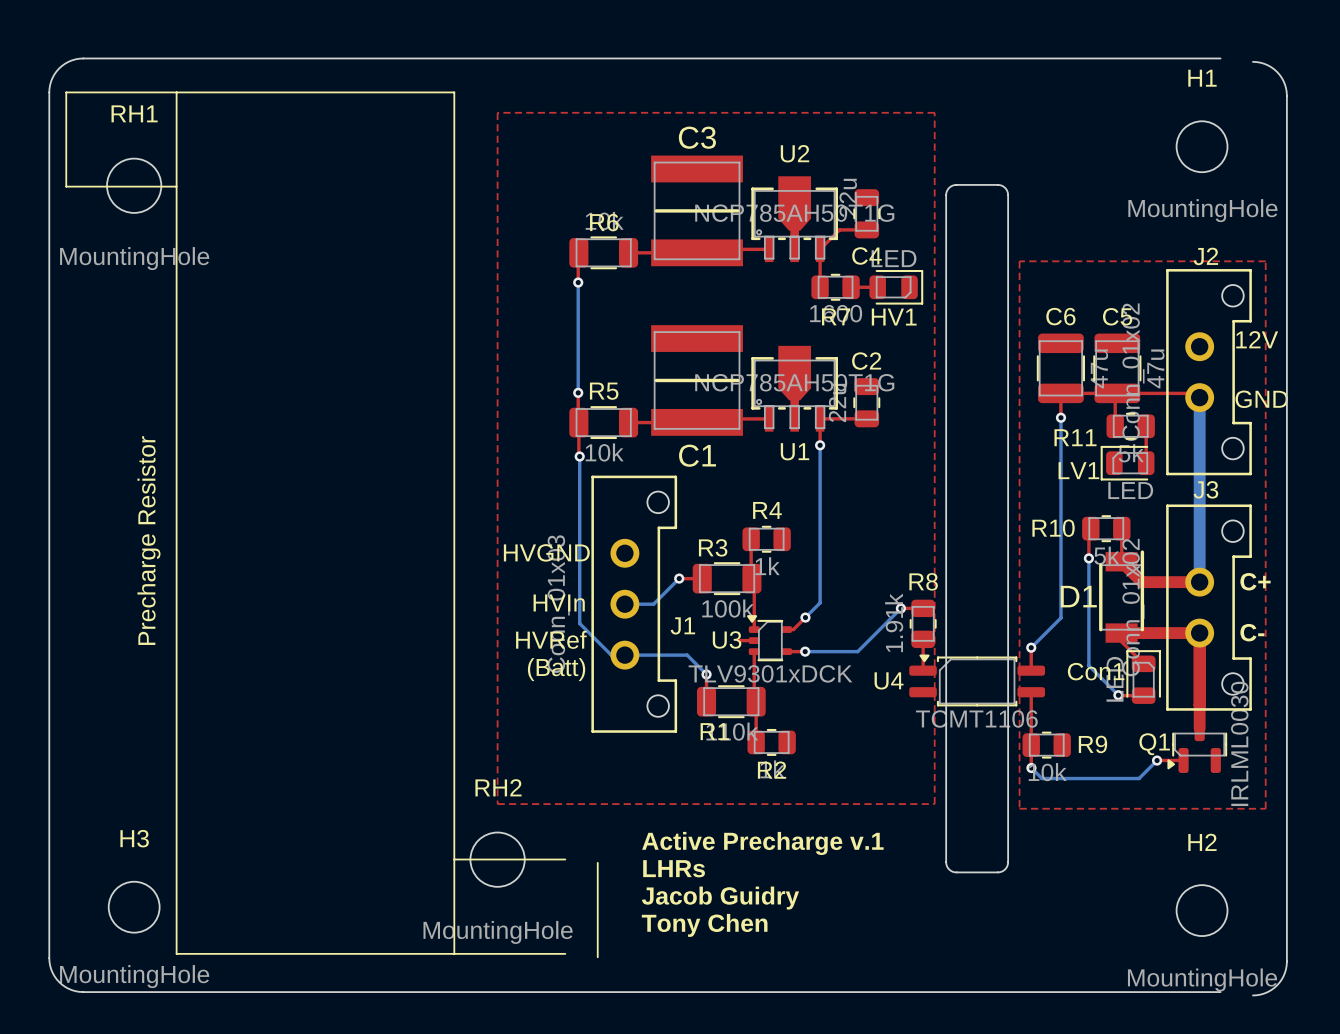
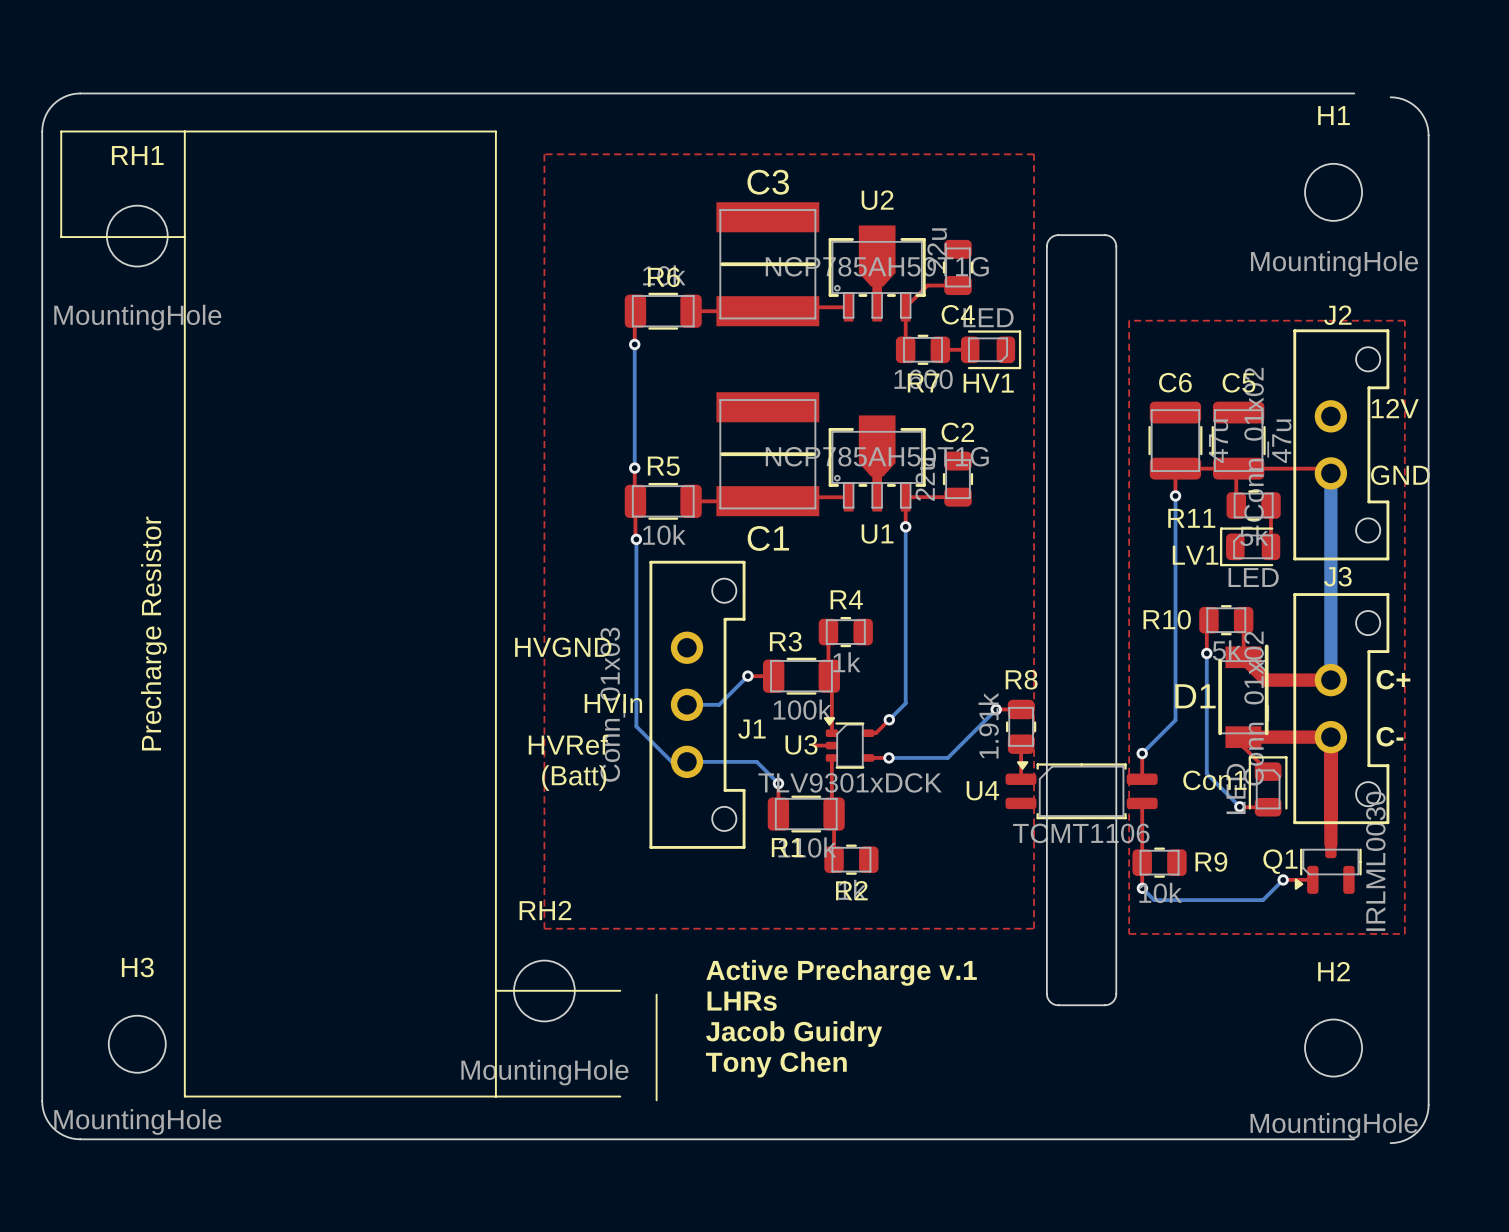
text position: HVGND (546, 552) -> HVGND (563, 647)
text position: HVRef (551, 639) -> HVRef (568, 744)
text position: (Batt) (556, 669) -> (Batt) (574, 778)

